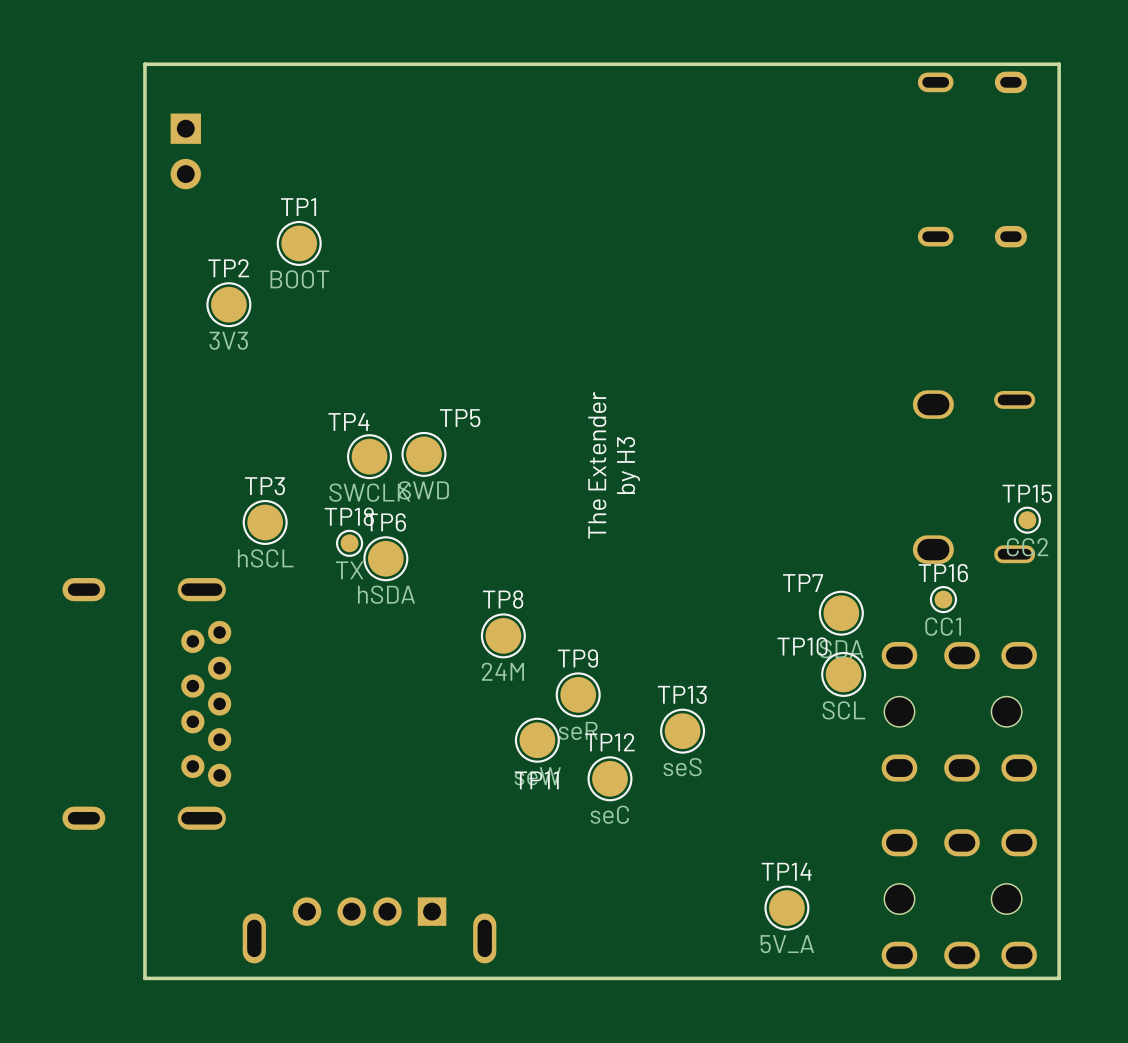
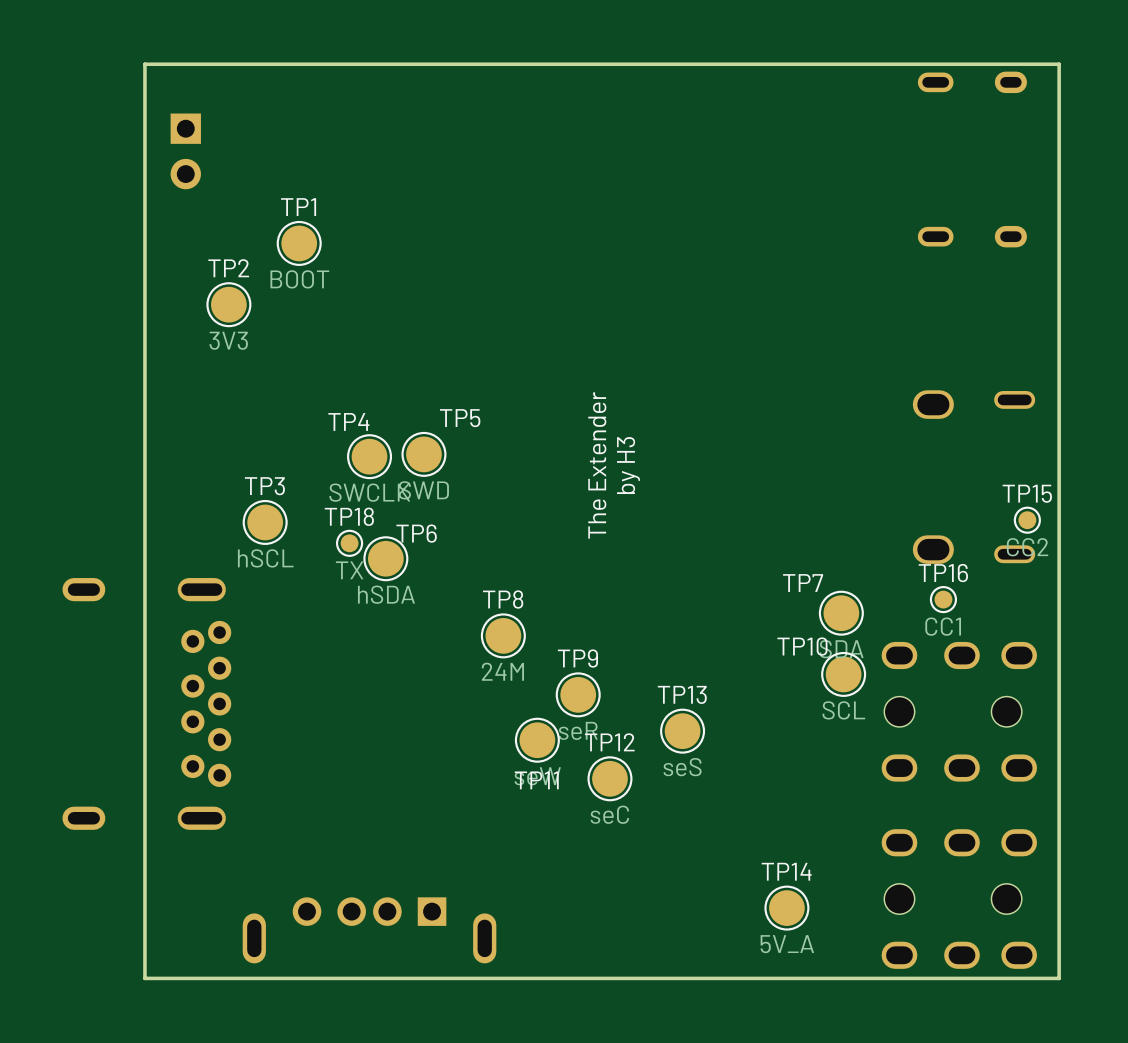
TP6 name position: TP6 (385, 522) -> TP6 (416, 533)

